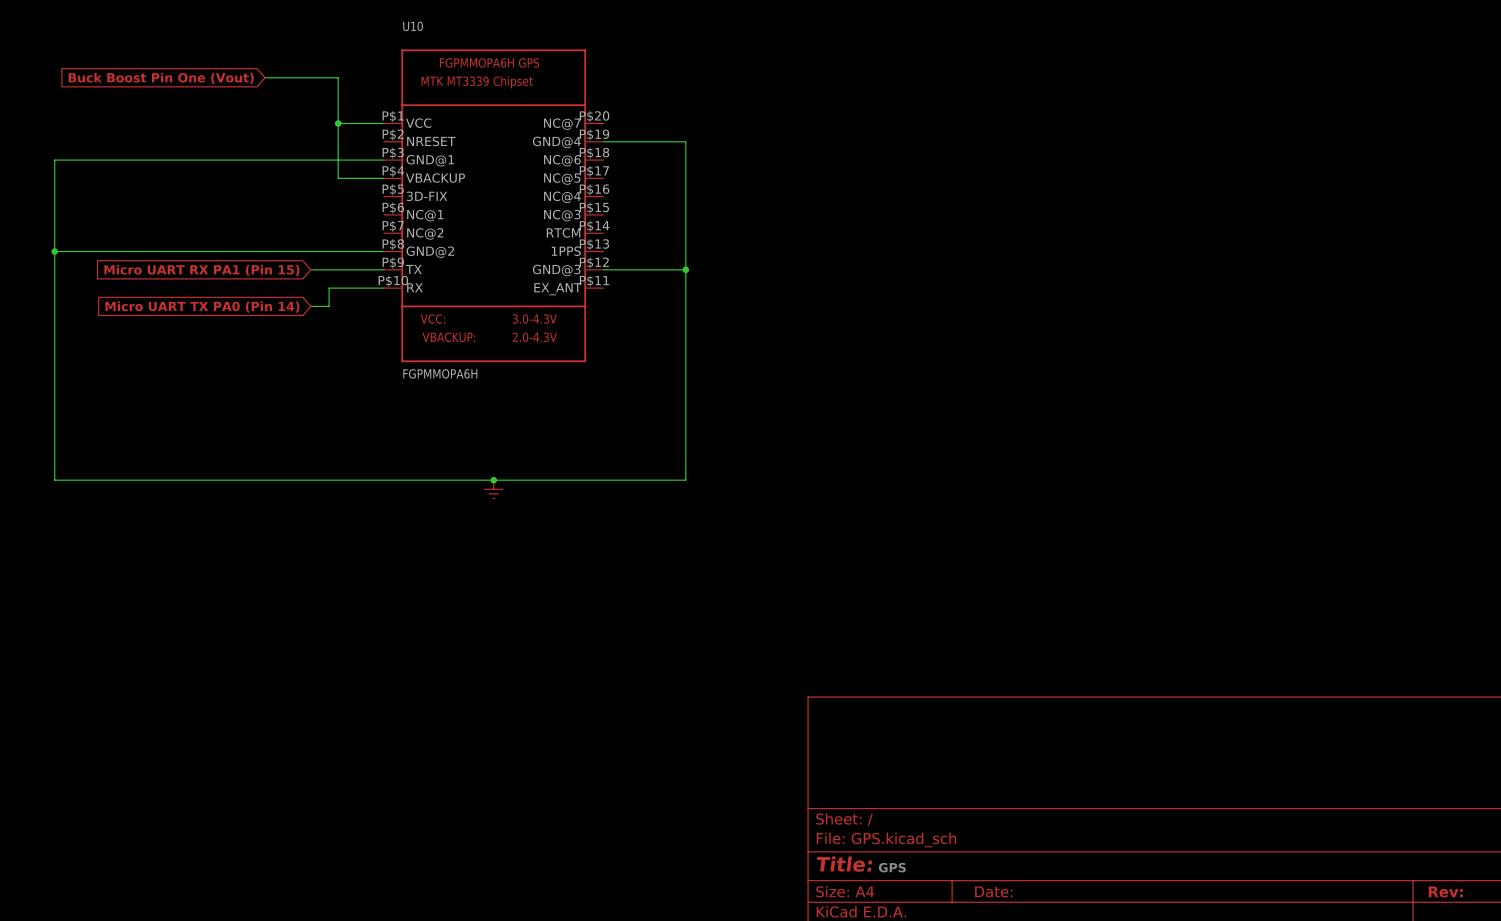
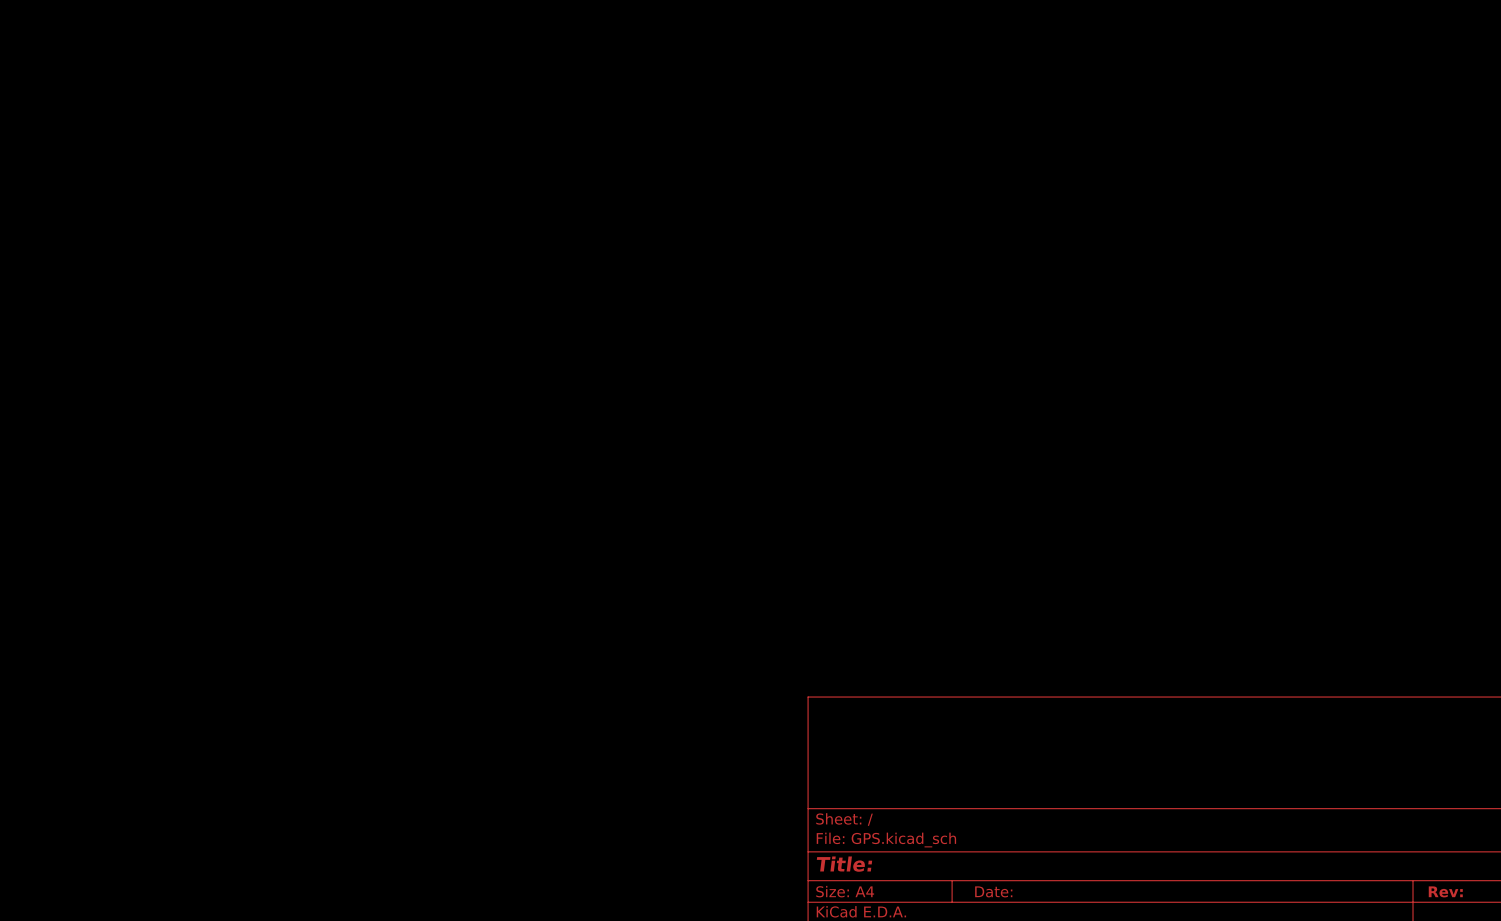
wire: (265, 77) (338, 77) (338, 178) (383, 178) -> none
global label: Buck Boost Pin One (Vout) (161, 78) -> none
wire: (338, 123) (383, 123) -> none
junction: (338, 123) -> none
wire: (603, 141) (685, 141) (685, 480) (54, 480) (54, 160) (383, 160) -> none
U10: FGPMMOPA6H (493, 205) -> none
wire: (54, 251) (383, 251) -> none
junction: (54, 251) -> none
wire: (310, 269) (383, 269) -> none
wire: (603, 269) (685, 269) -> none
junction: (685, 269) -> none
global label: Micro UART RX PA1 (Pin 15) (201, 270) -> none
wire: (383, 288) (329, 288) (329, 306) (310, 306) -> none
global label: Micro UART TX PA0 (Pin 14) (202, 307) -> none
junction: (493, 480) -> none
power symbol: (493, 489) -> none
text: GPS (892, 867) -> none

